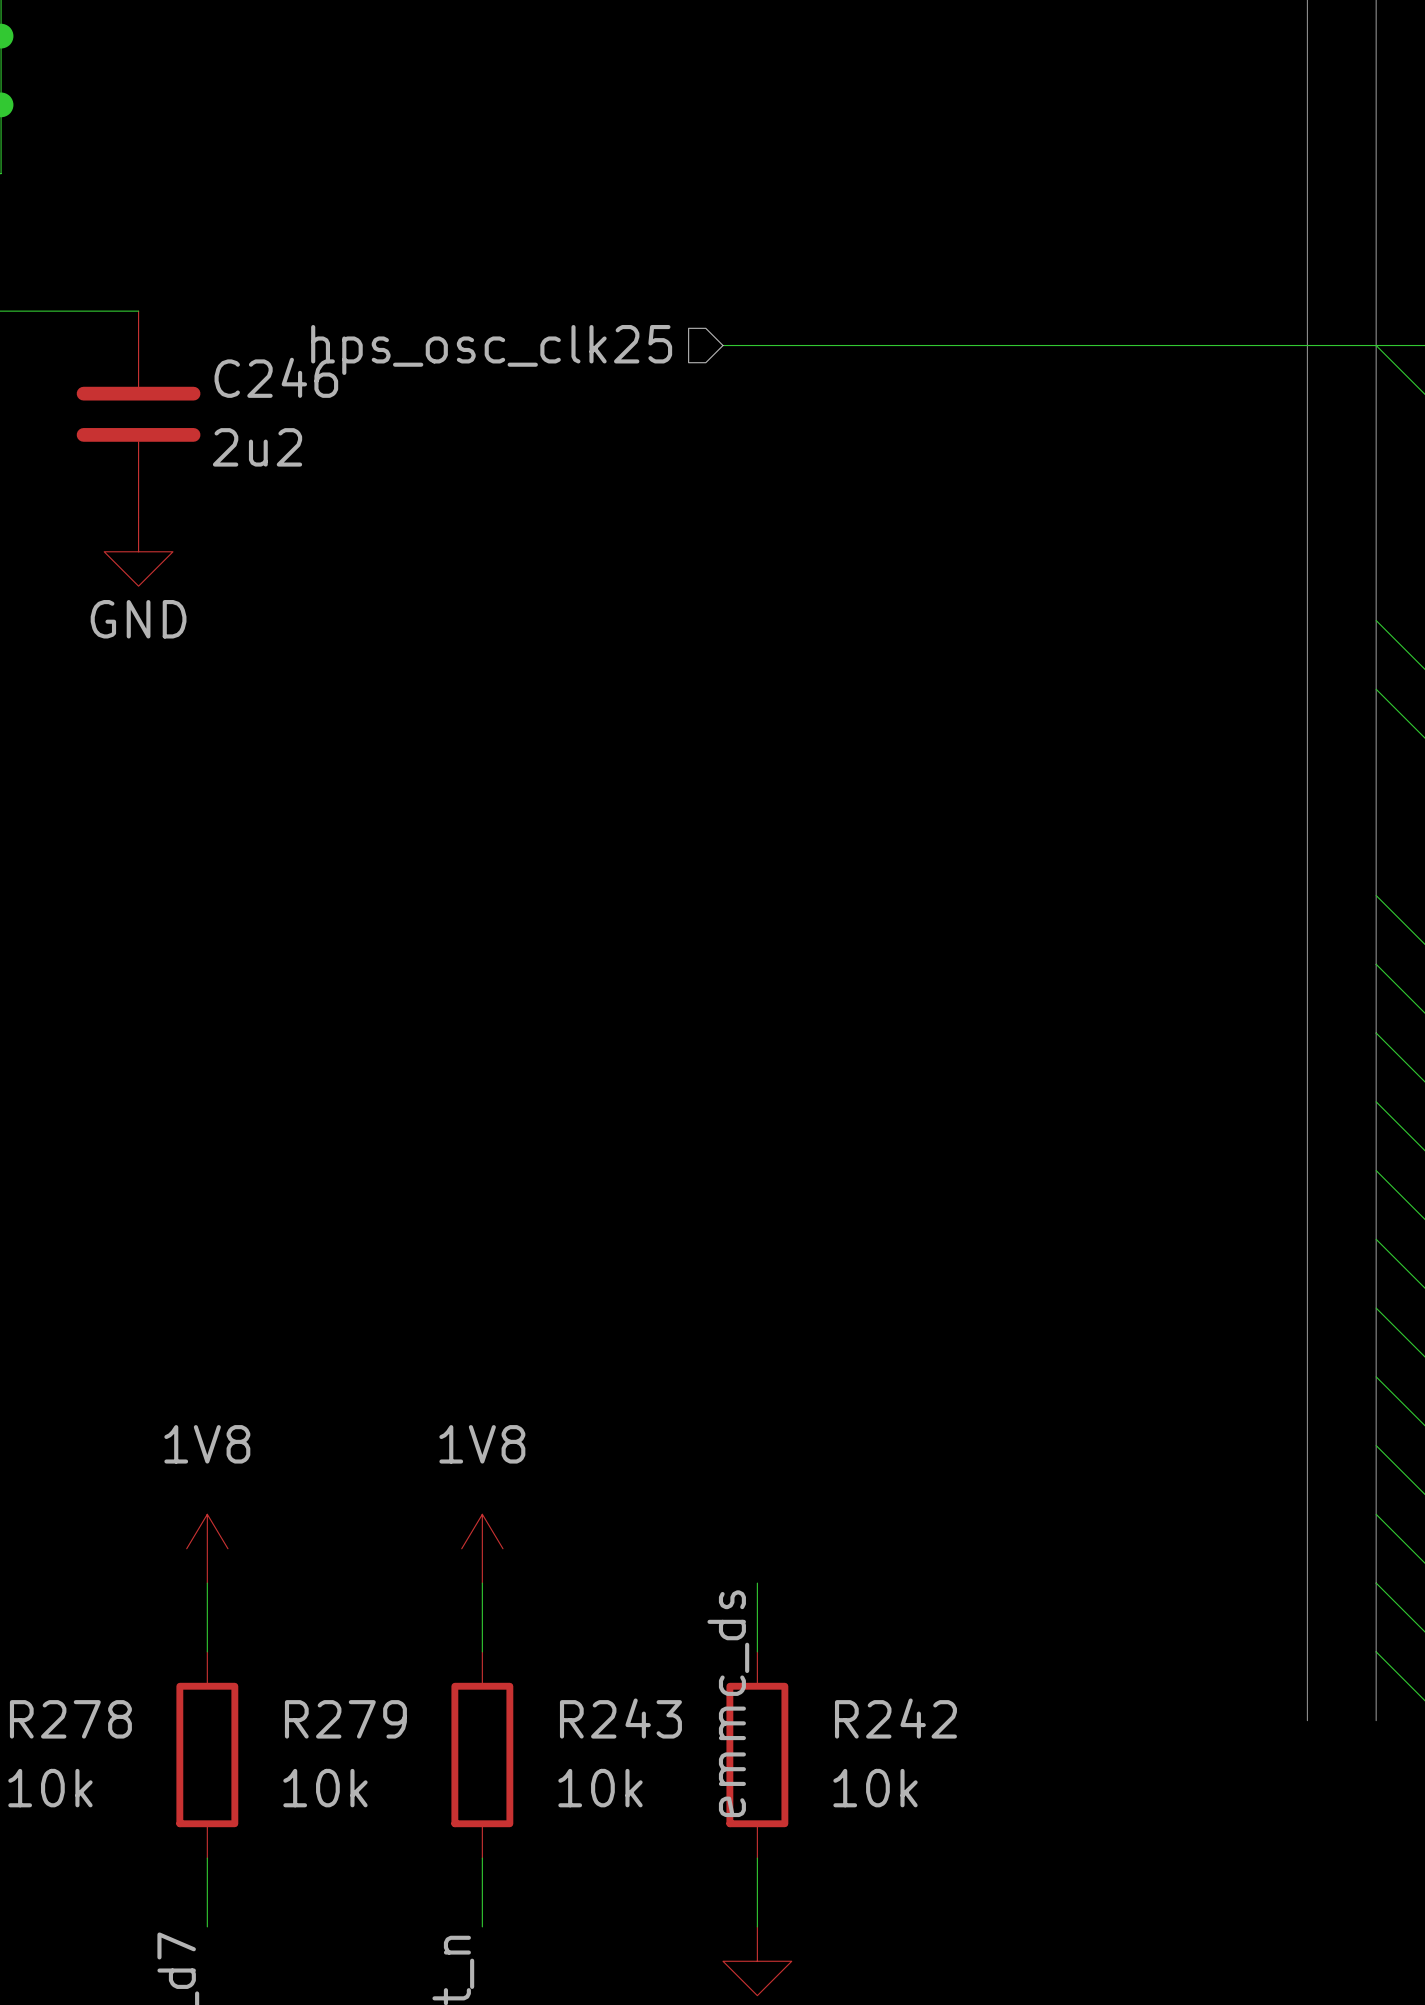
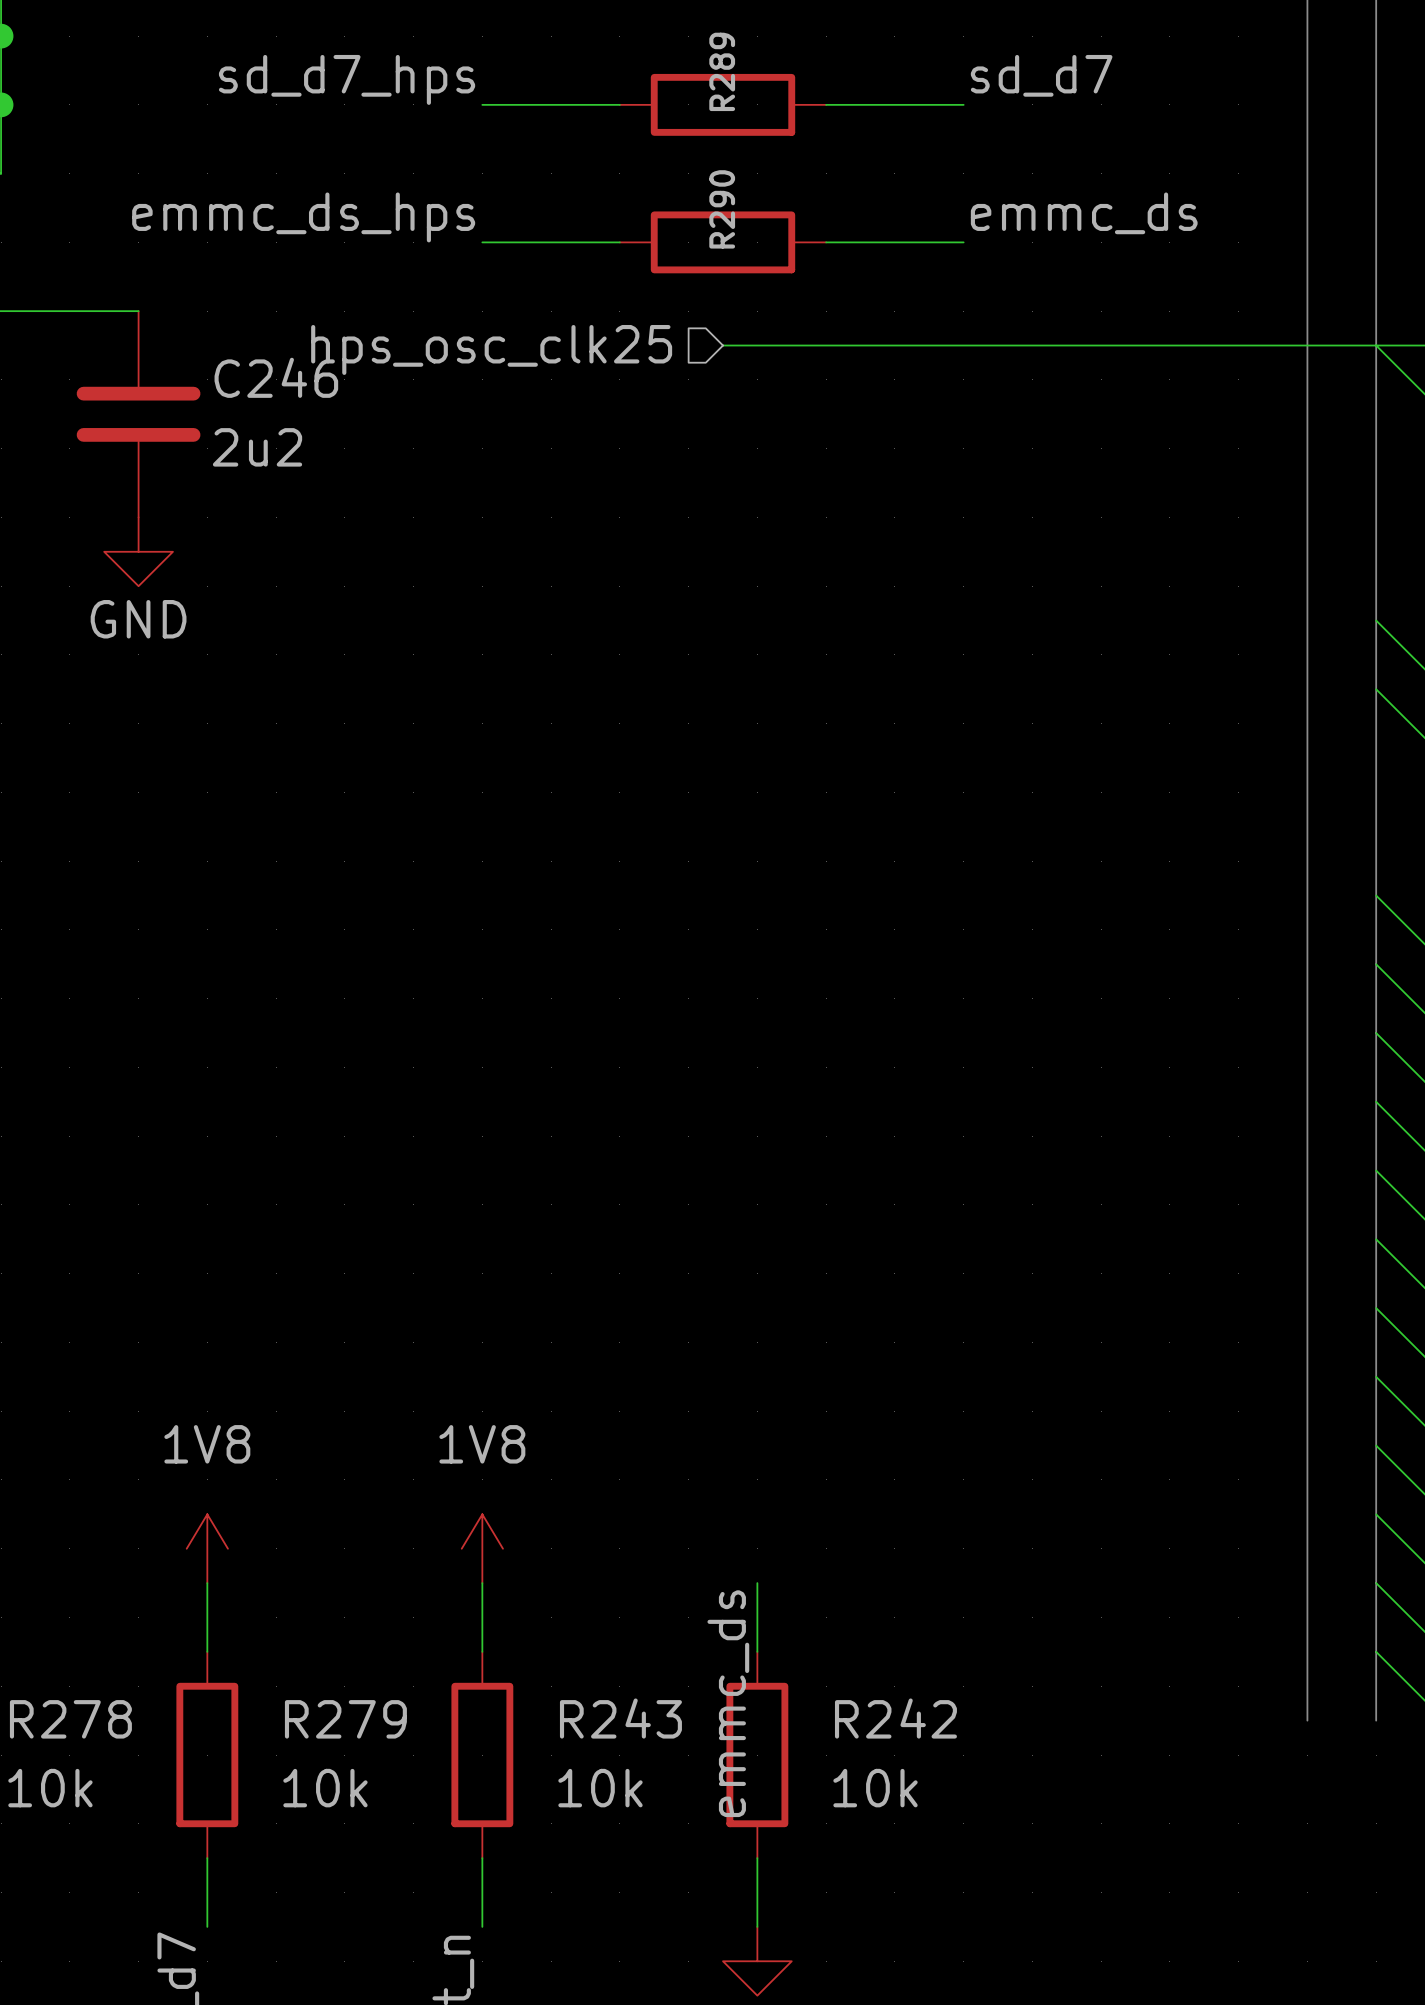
label: none -> sd_d7 (1041, 75)
label: none -> sd_d7_hps (347, 79)
wire: none -> (482, 104) (619, 104)
R289: none -> (723, 104)
wire: none -> (826, 104) (963, 104)
label: none -> emmc_ds (1084, 213)
label: none -> emmc_ds_hps (303, 217)
wire: none -> (482, 242) (619, 242)
R290: none -> (723, 242)
wire: none -> (826, 242) (963, 242)

